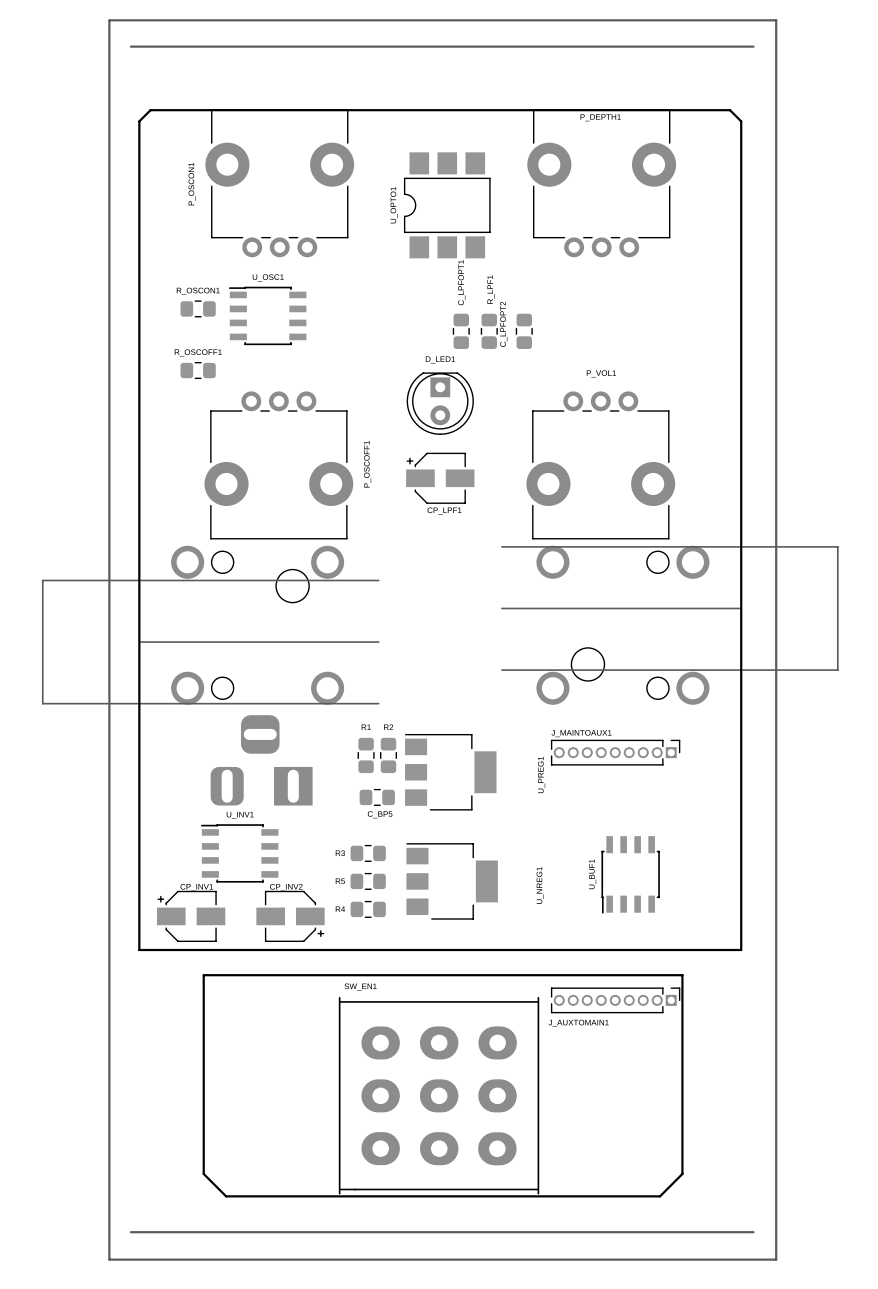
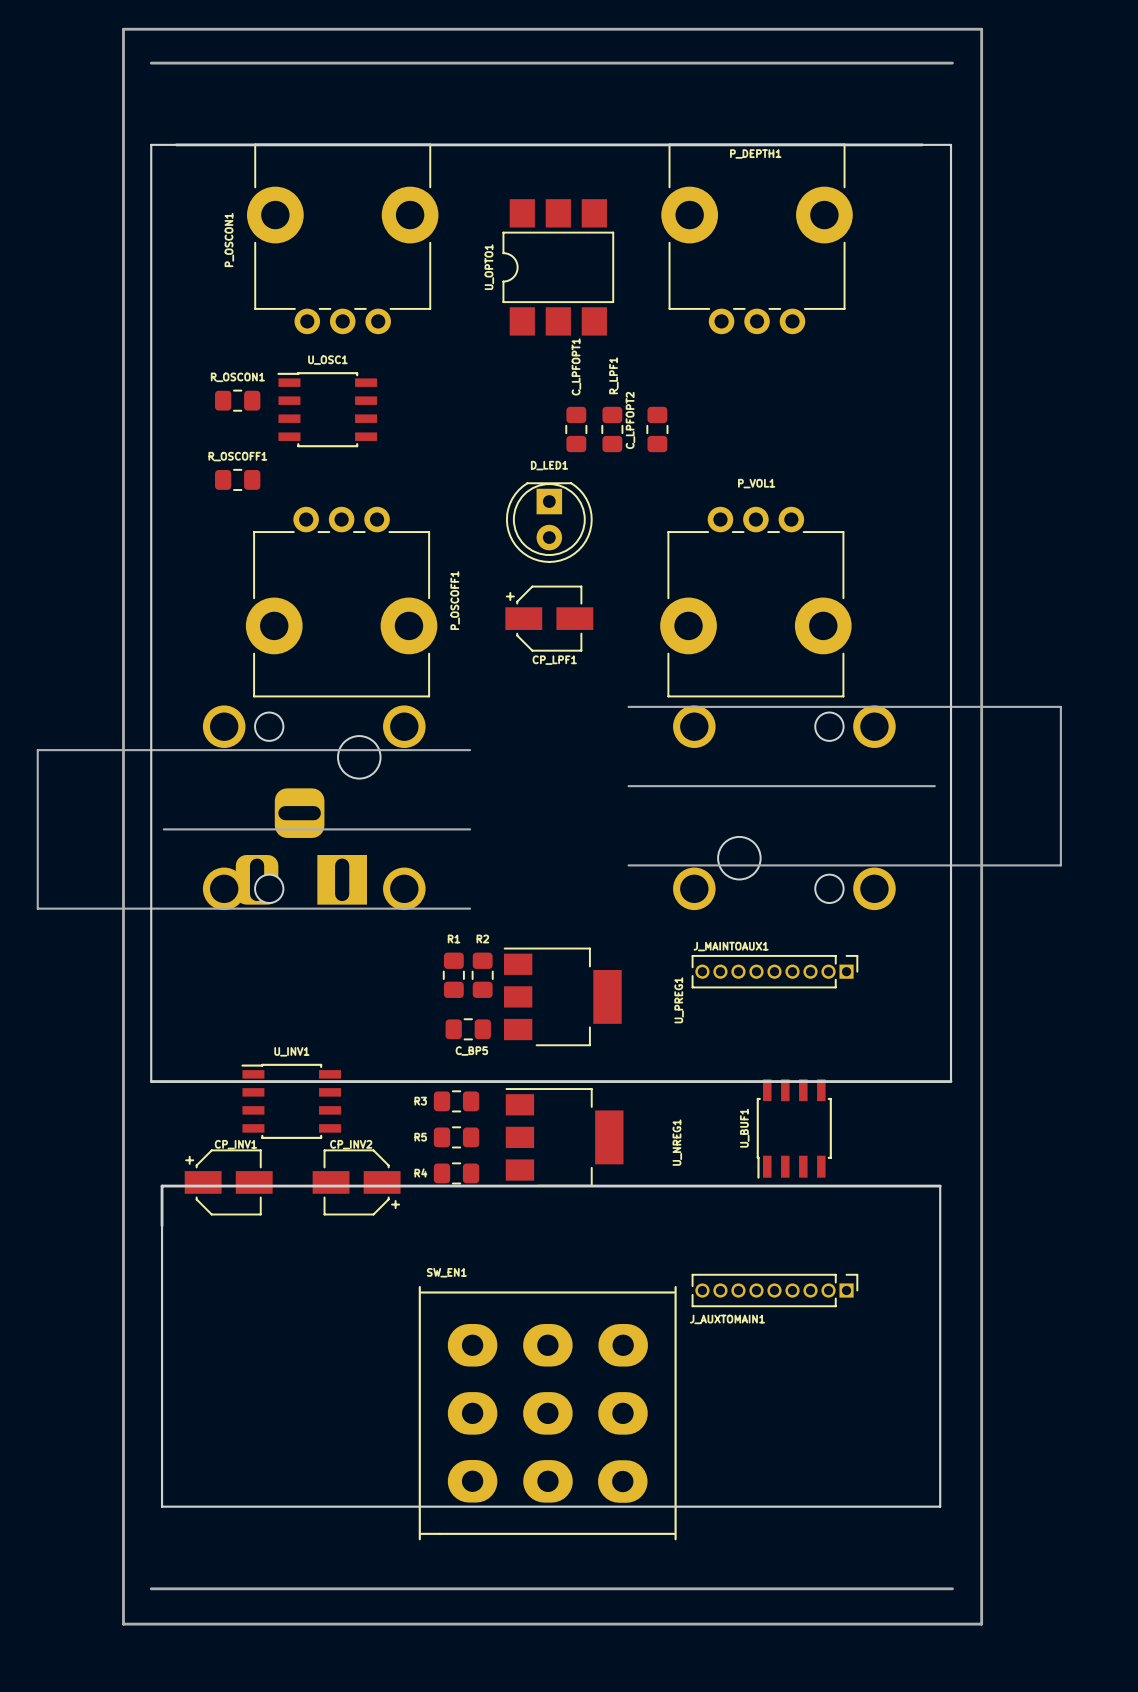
board edge: (150, 110) (139, 121) (139, 919) -> (162, 1225) (162, 1506) (940, 1506) (940, 1186) (162, 1186)
board edge: (730, 110) (741, 121) (741, 950) (139, 950) -> (922, 144) (951, 144) (951, 1081) (151, 1081) (151, 144) (176, 144)
part position: (261, 760) -> (301, 846)
board edge: (203, 975) (203, 1173) (226, 1196) (660, 1196) (682, 1173) (682, 975) (203, 975) -> none

